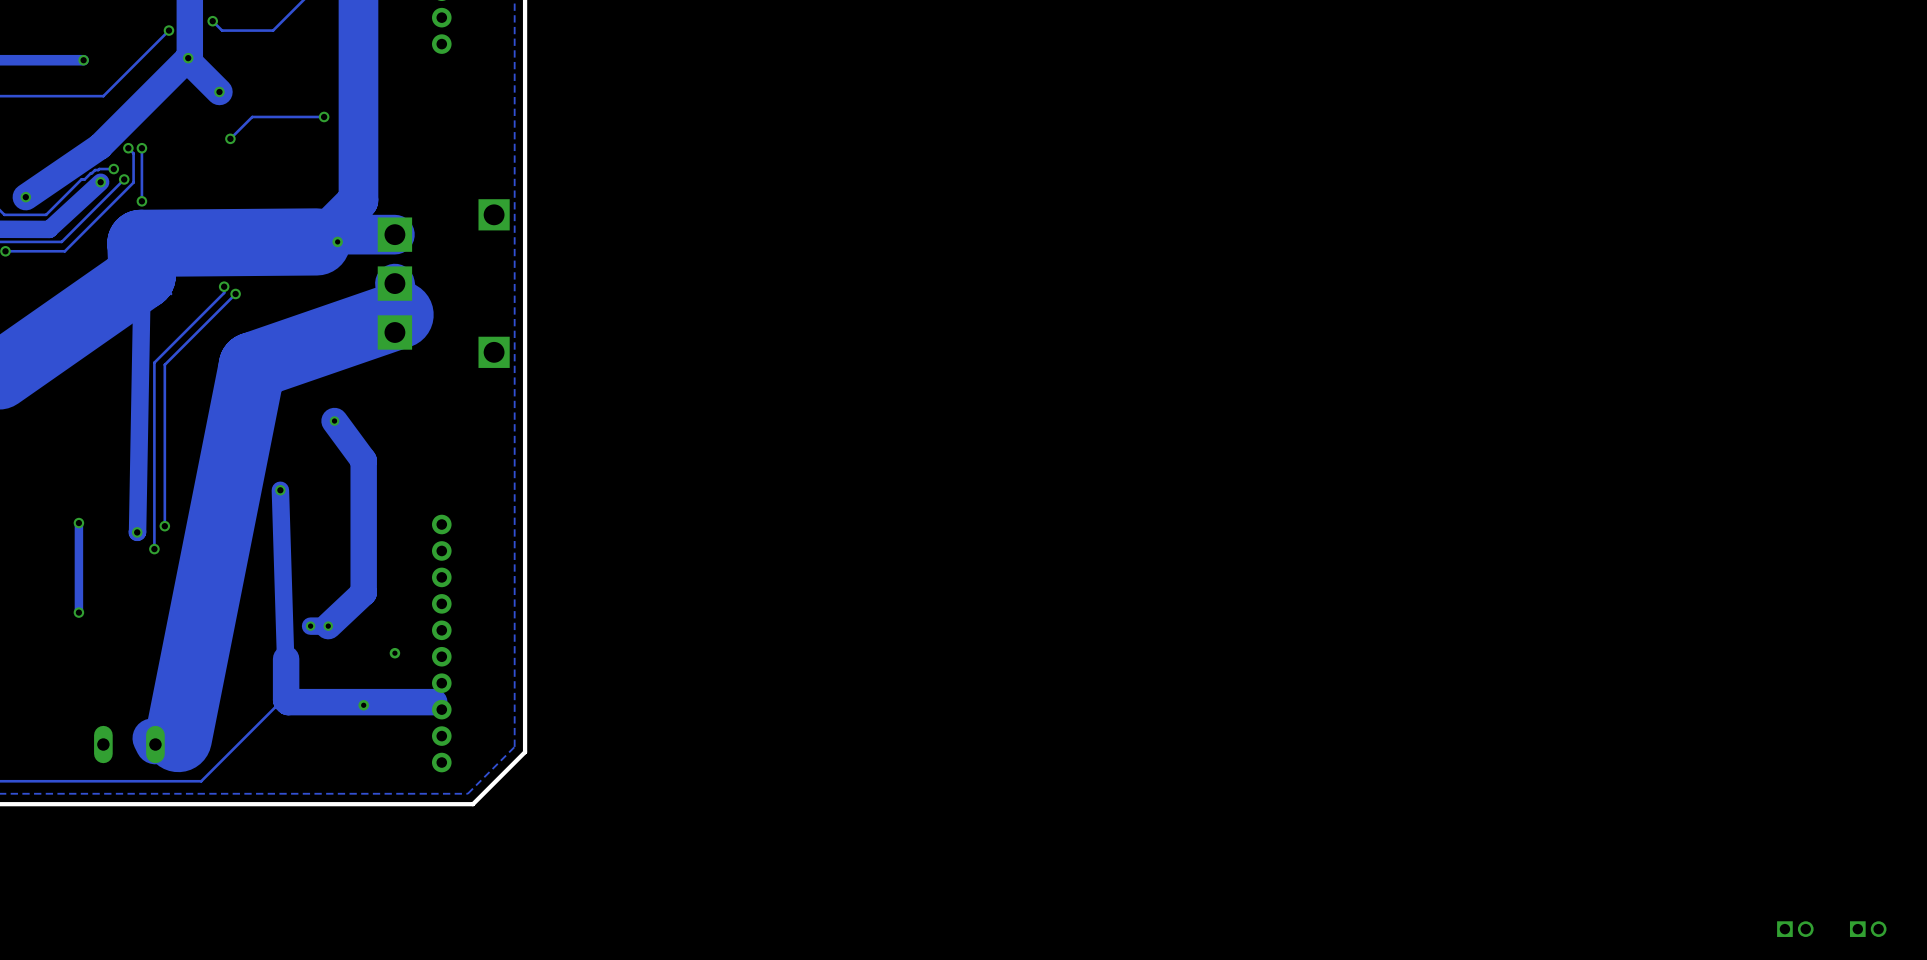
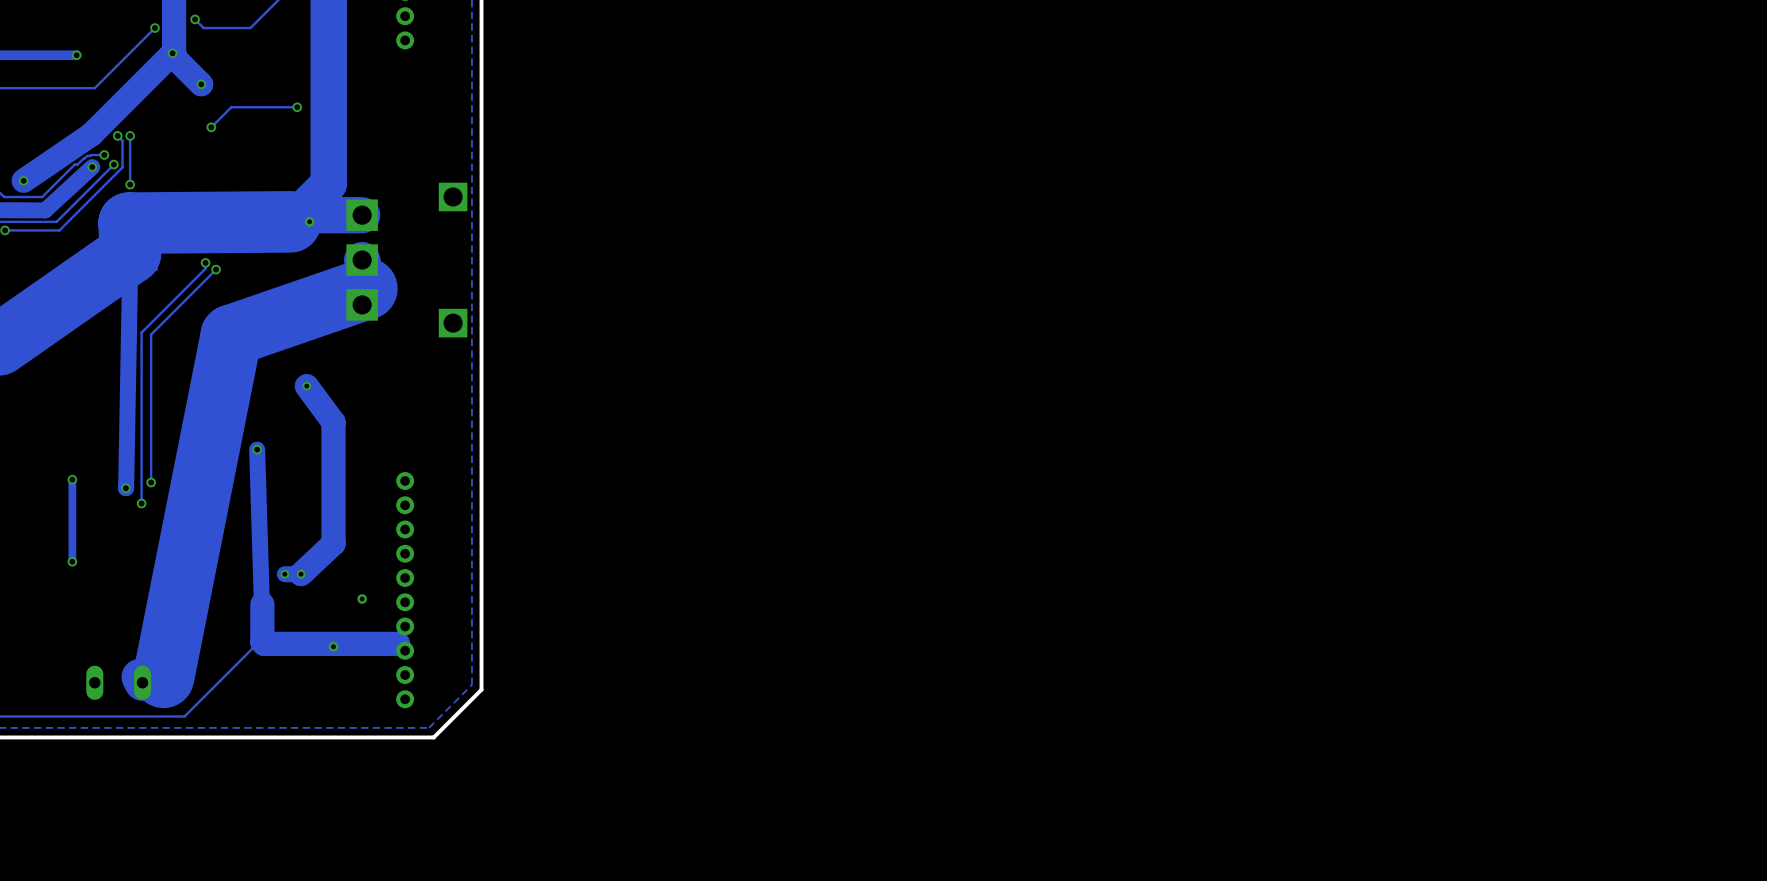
part: (1795, 929) -> none
part: (1868, 929) -> none

